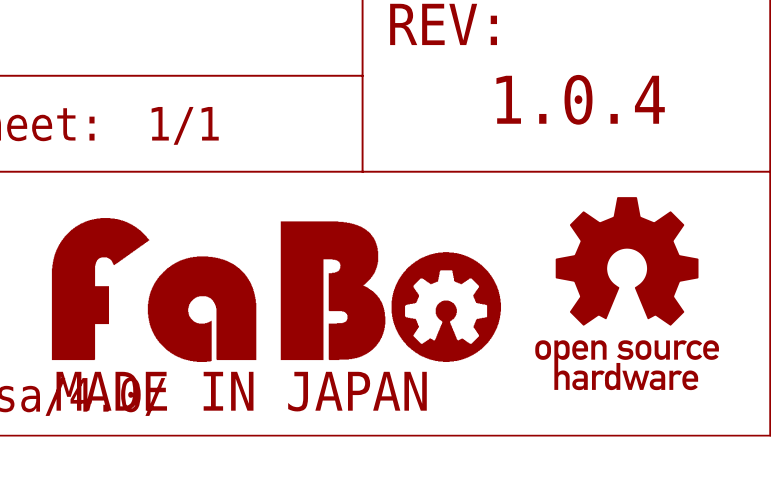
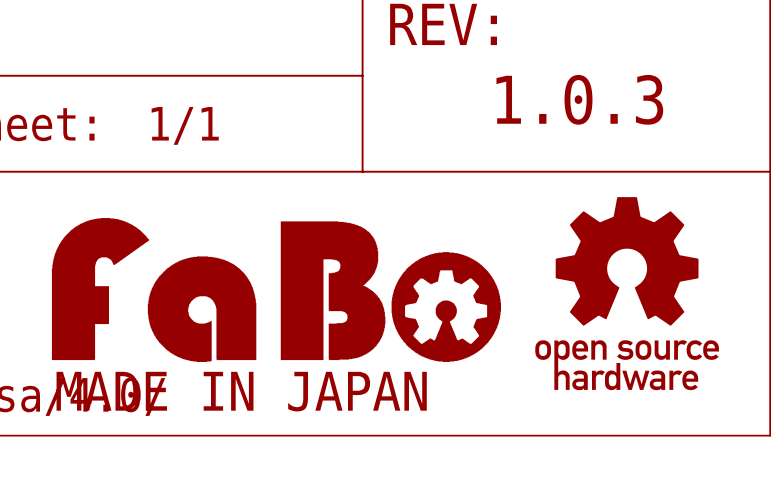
text: 1.0.4 (580, 99) -> 1.0.3 (579, 99)

